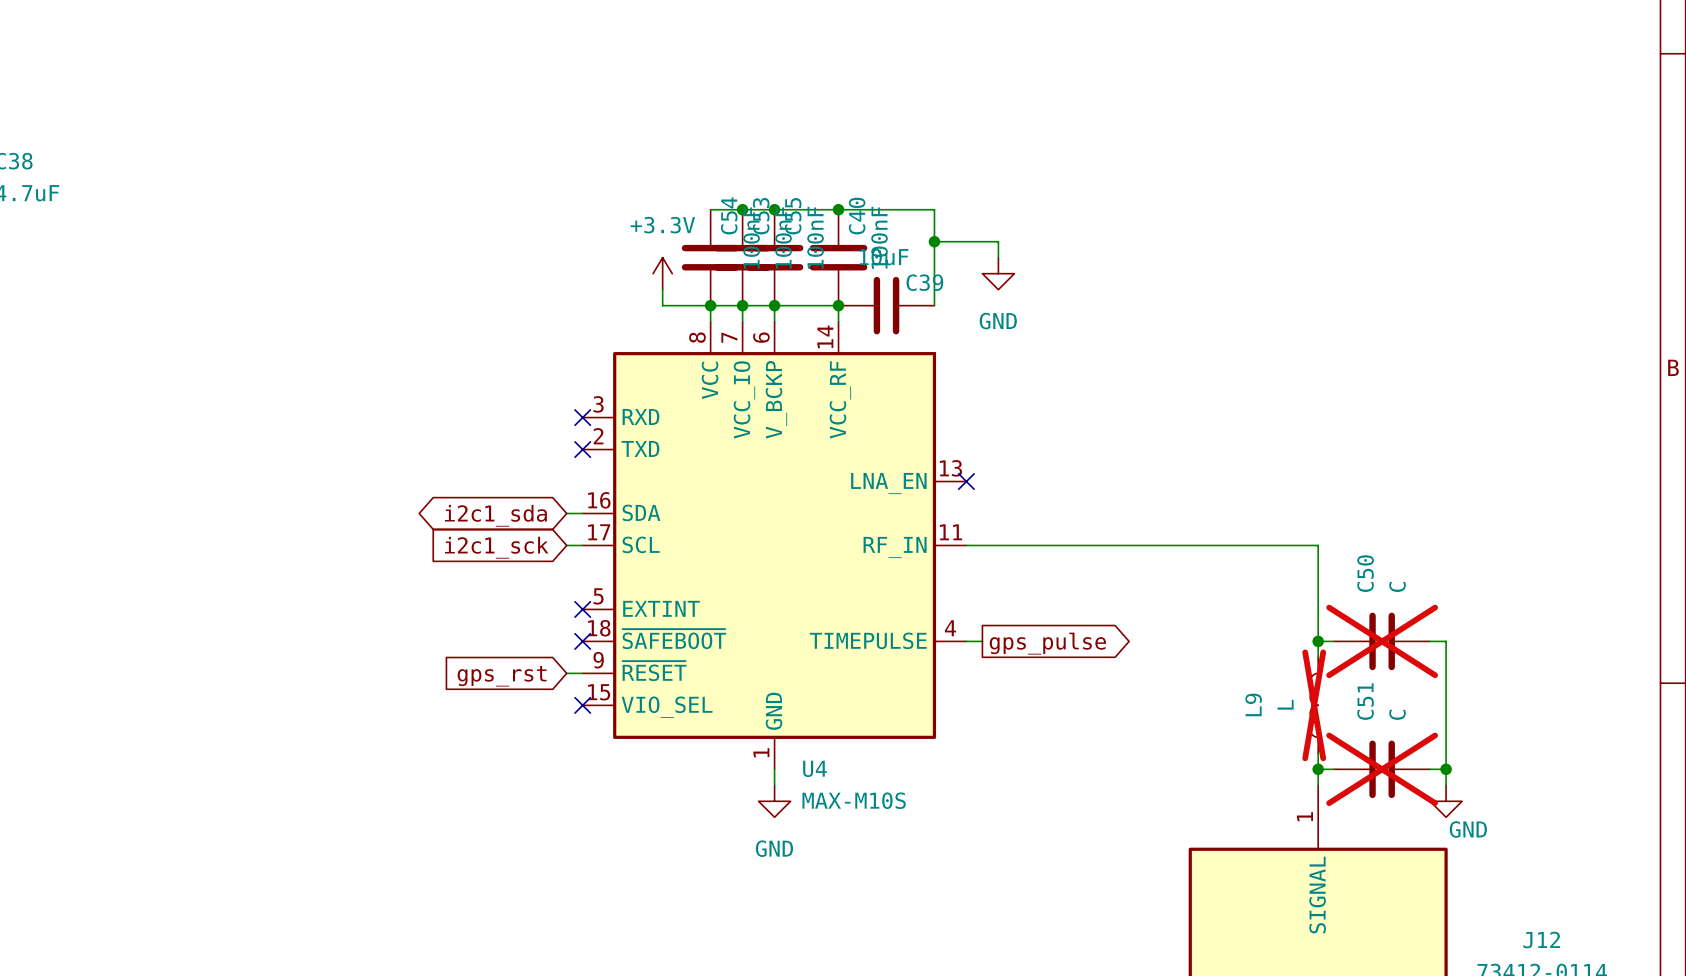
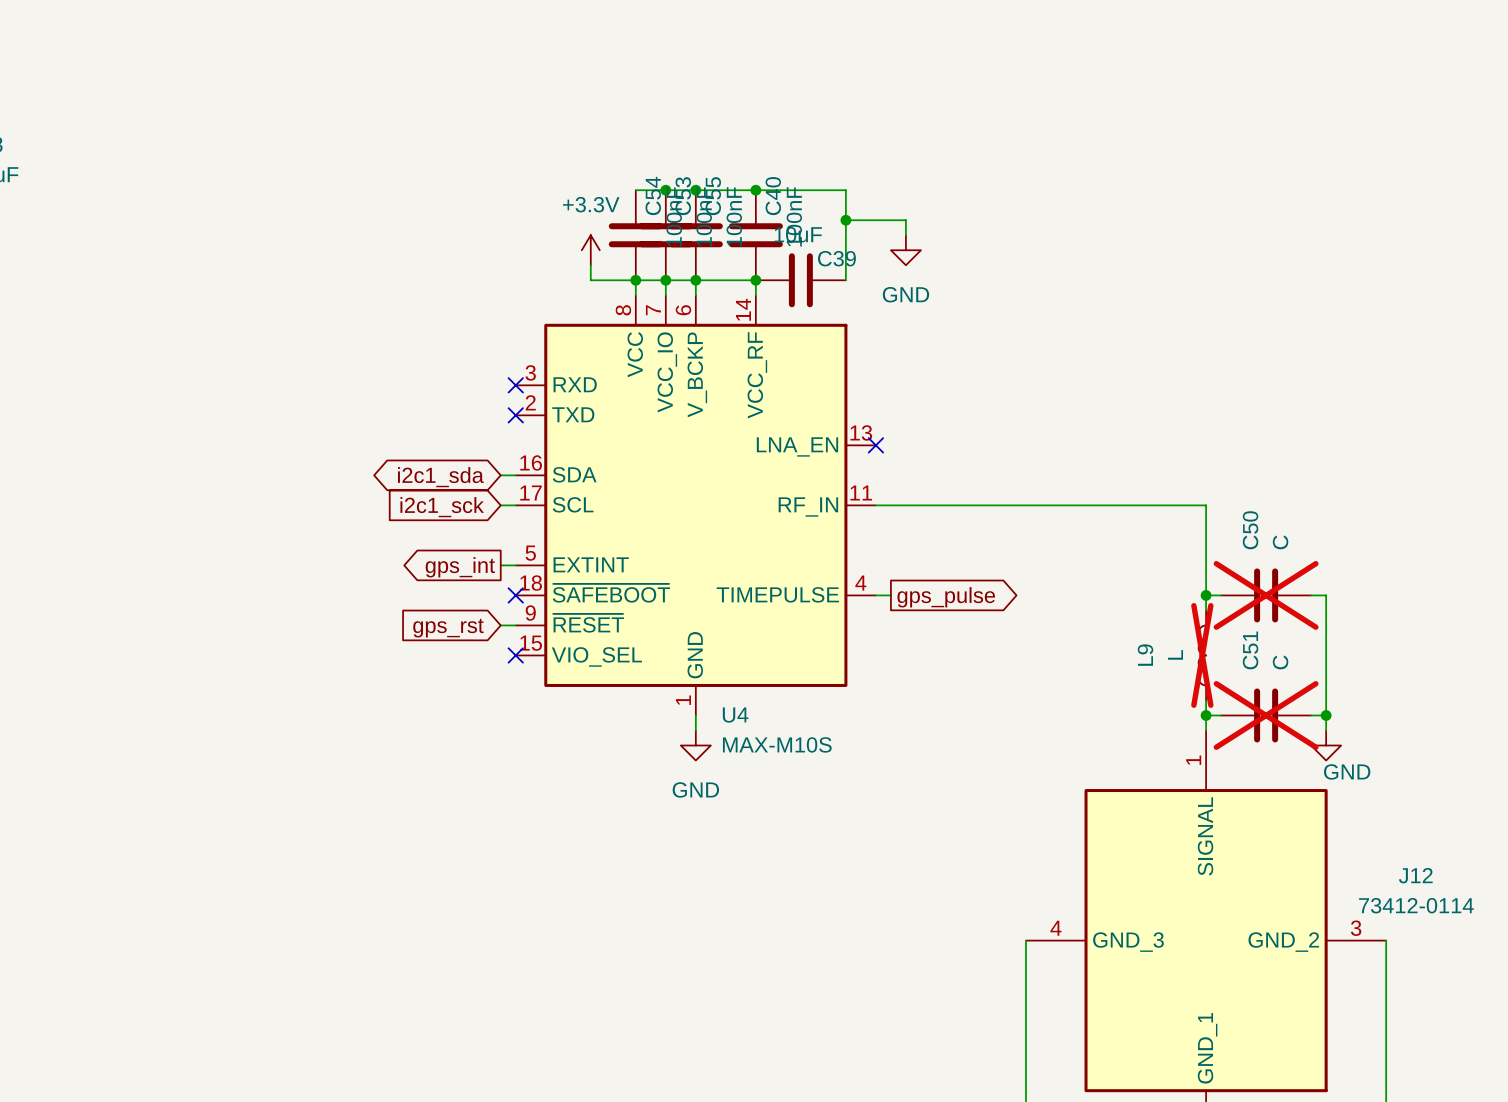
wire: none -> (500, 565) (515, 565)
no-connect mark: (582, 609) -> none
global label: none -> gps_int (460, 567)

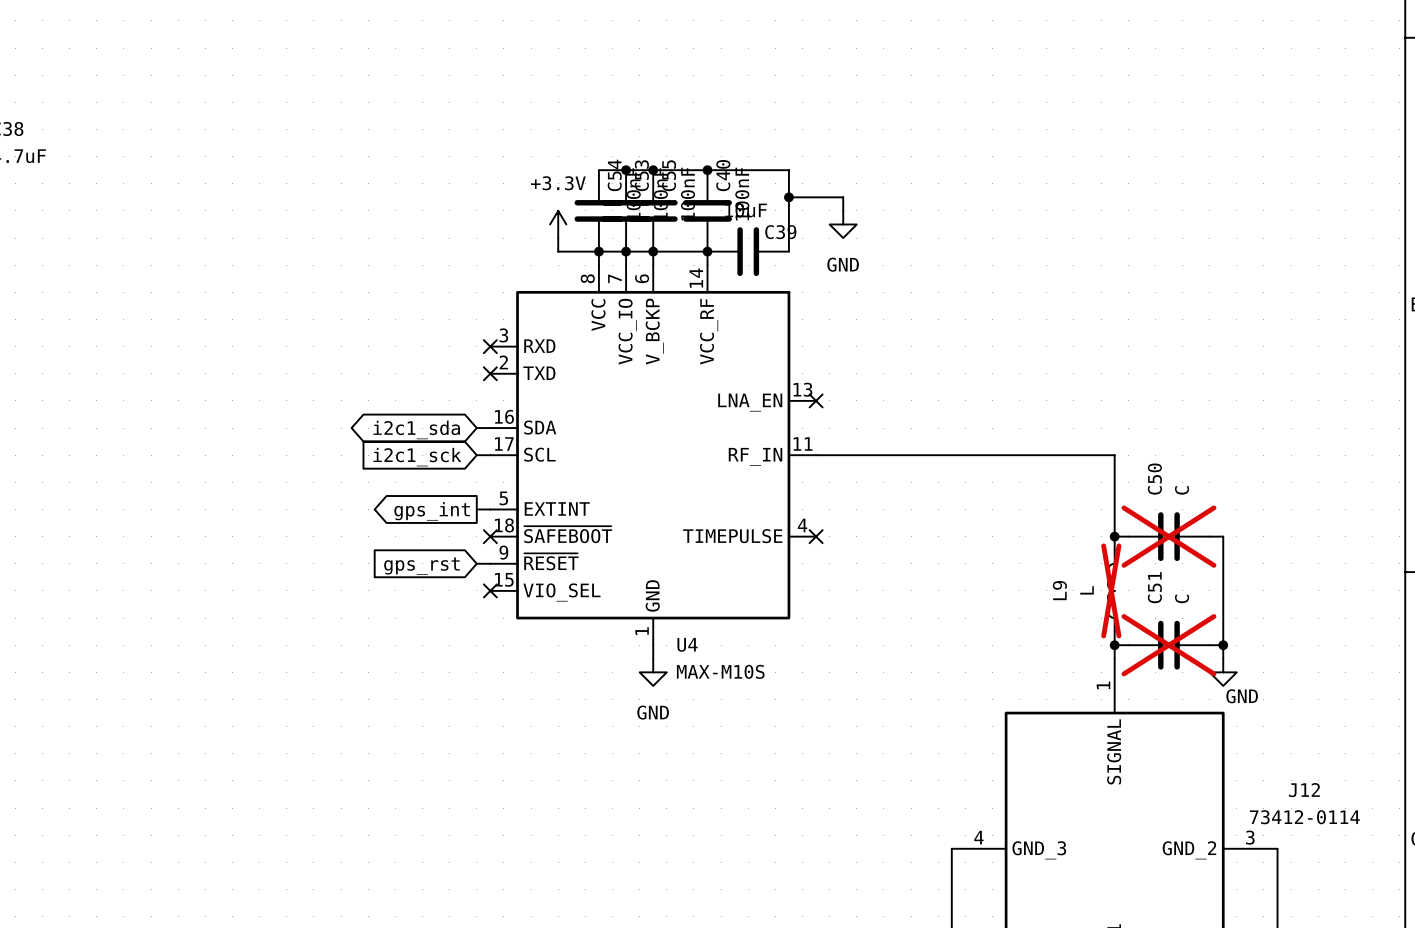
wire: (875, 595) (890, 595) -> none
no-connect mark: none -> (816, 536)
global label: gps_pulse (946, 597) -> none

